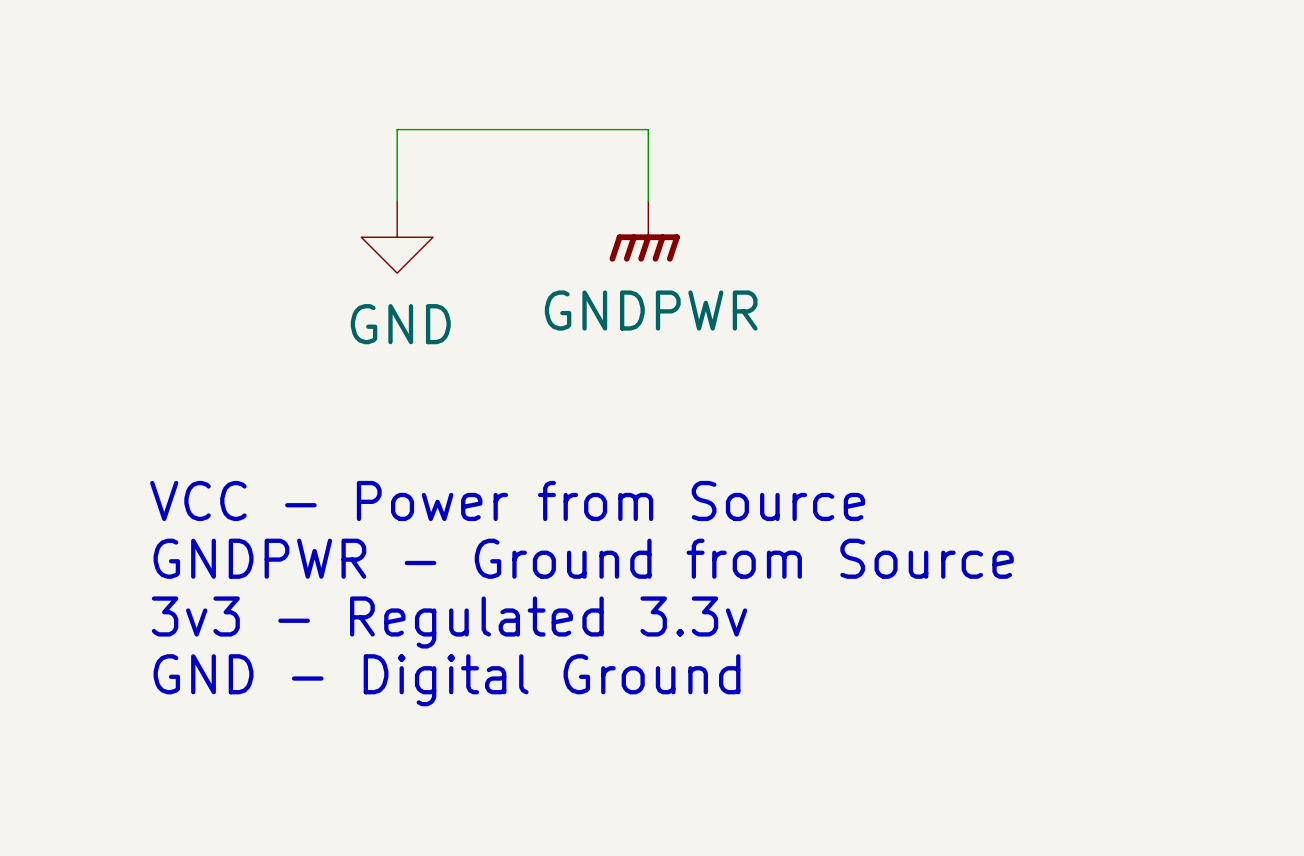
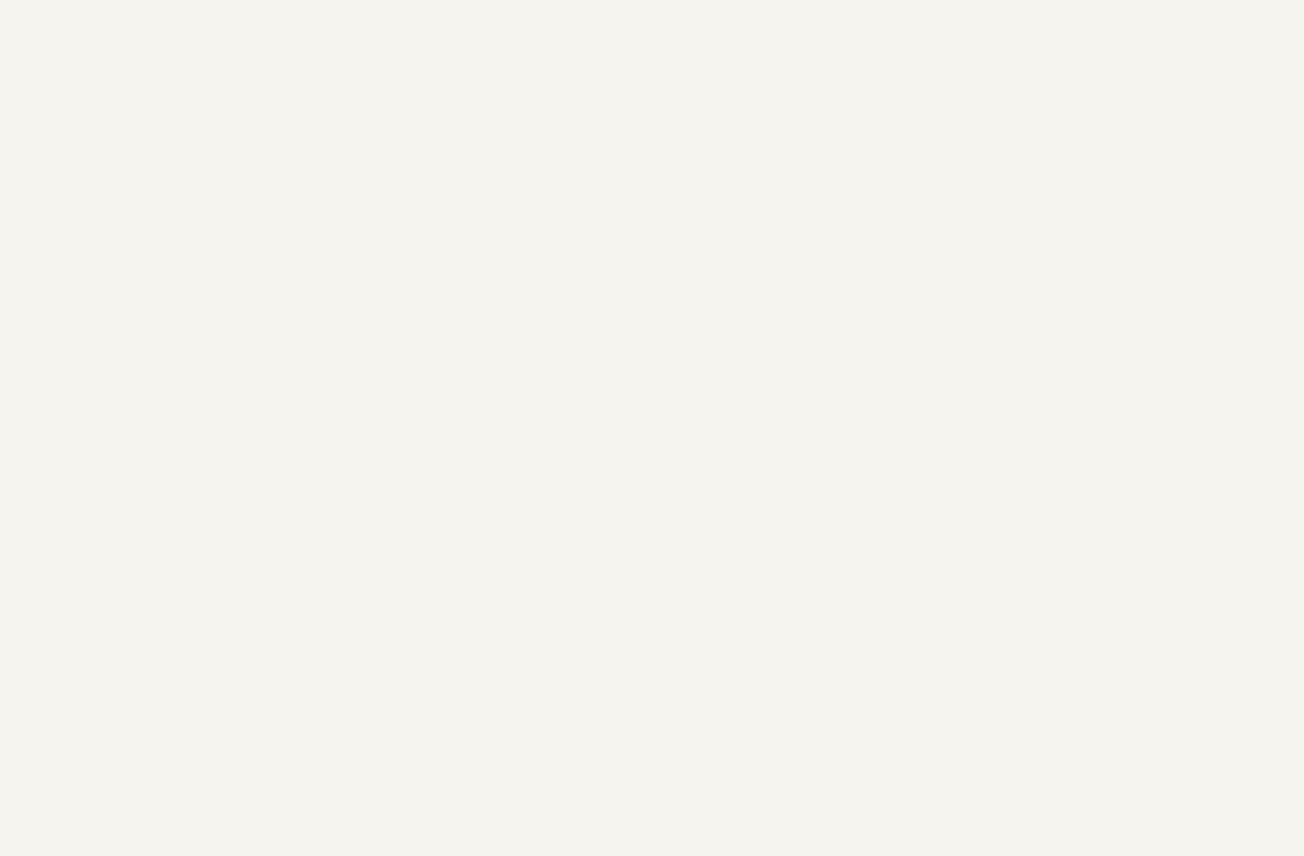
wire: (397, 201) (397, 129) (648, 129) (648, 201) -> none
power symbol: GNDPWR (644, 231) -> none
power symbol: GND (397, 237) -> none
text: VCC - Power from Source (507, 500) -> none
text: GNDPWR - Ground from Source (583, 558) -> none
text: 3v3 - Regulated 3.3v (449, 622) -> none
text: GND - Digital Ground (446, 680) -> none

